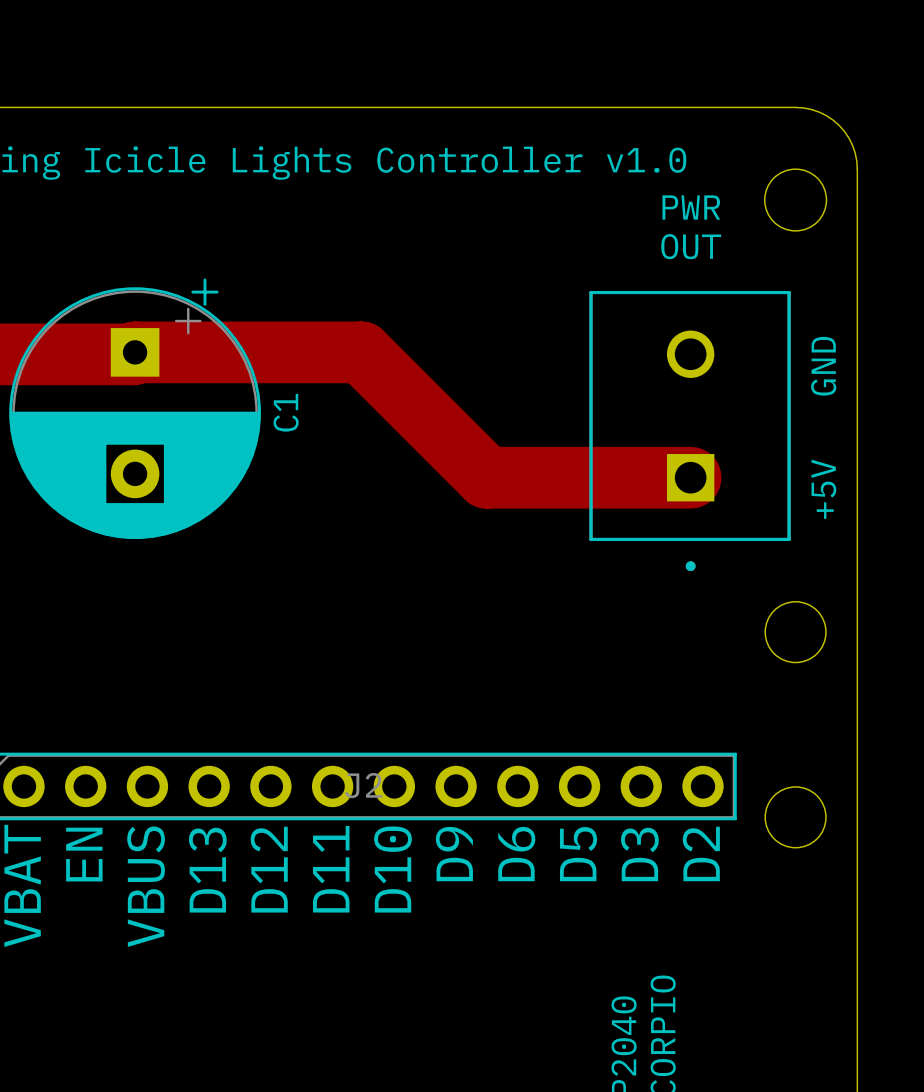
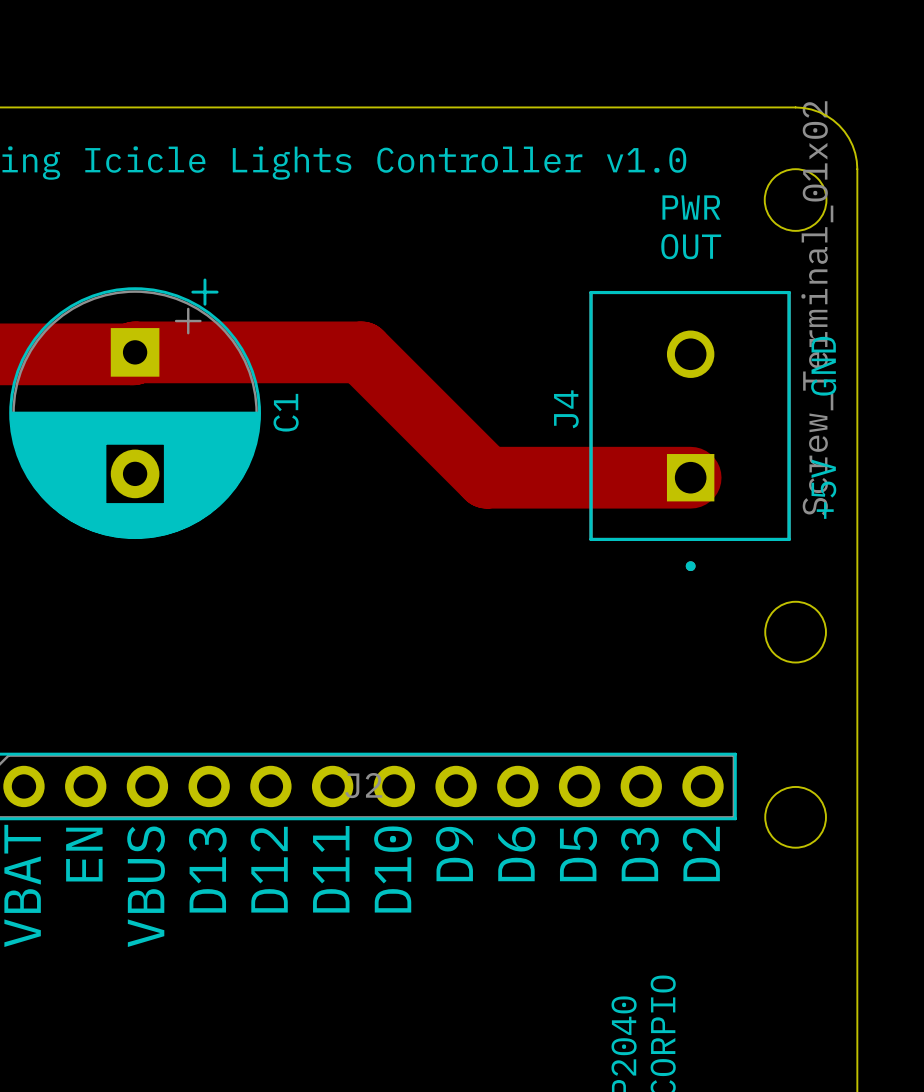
J4 value: none -> Screw_Terminal_01x02 (817, 308)
J4 name: none -> J4 (566, 409)

